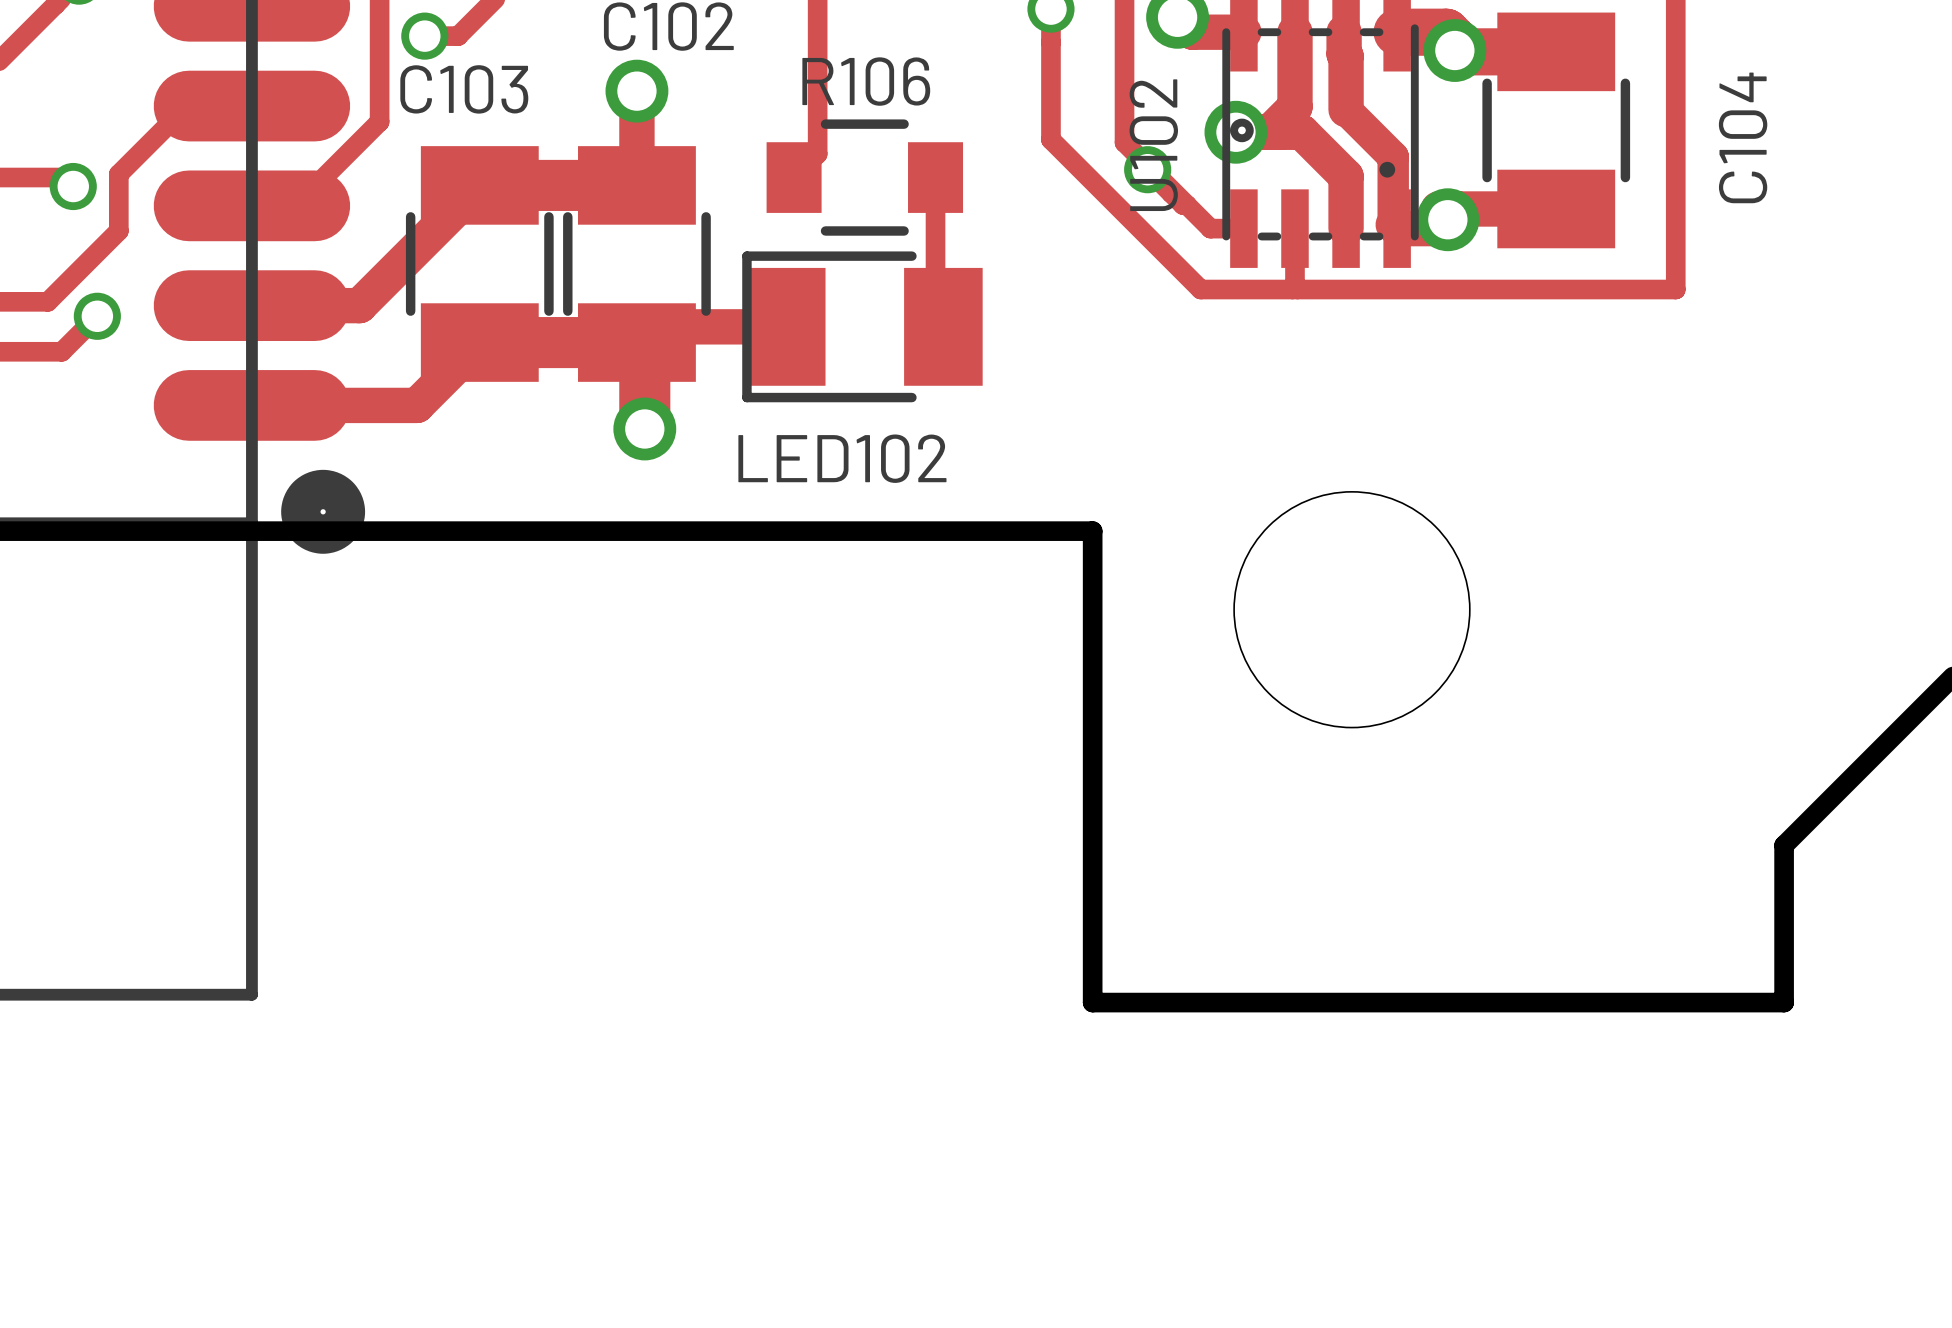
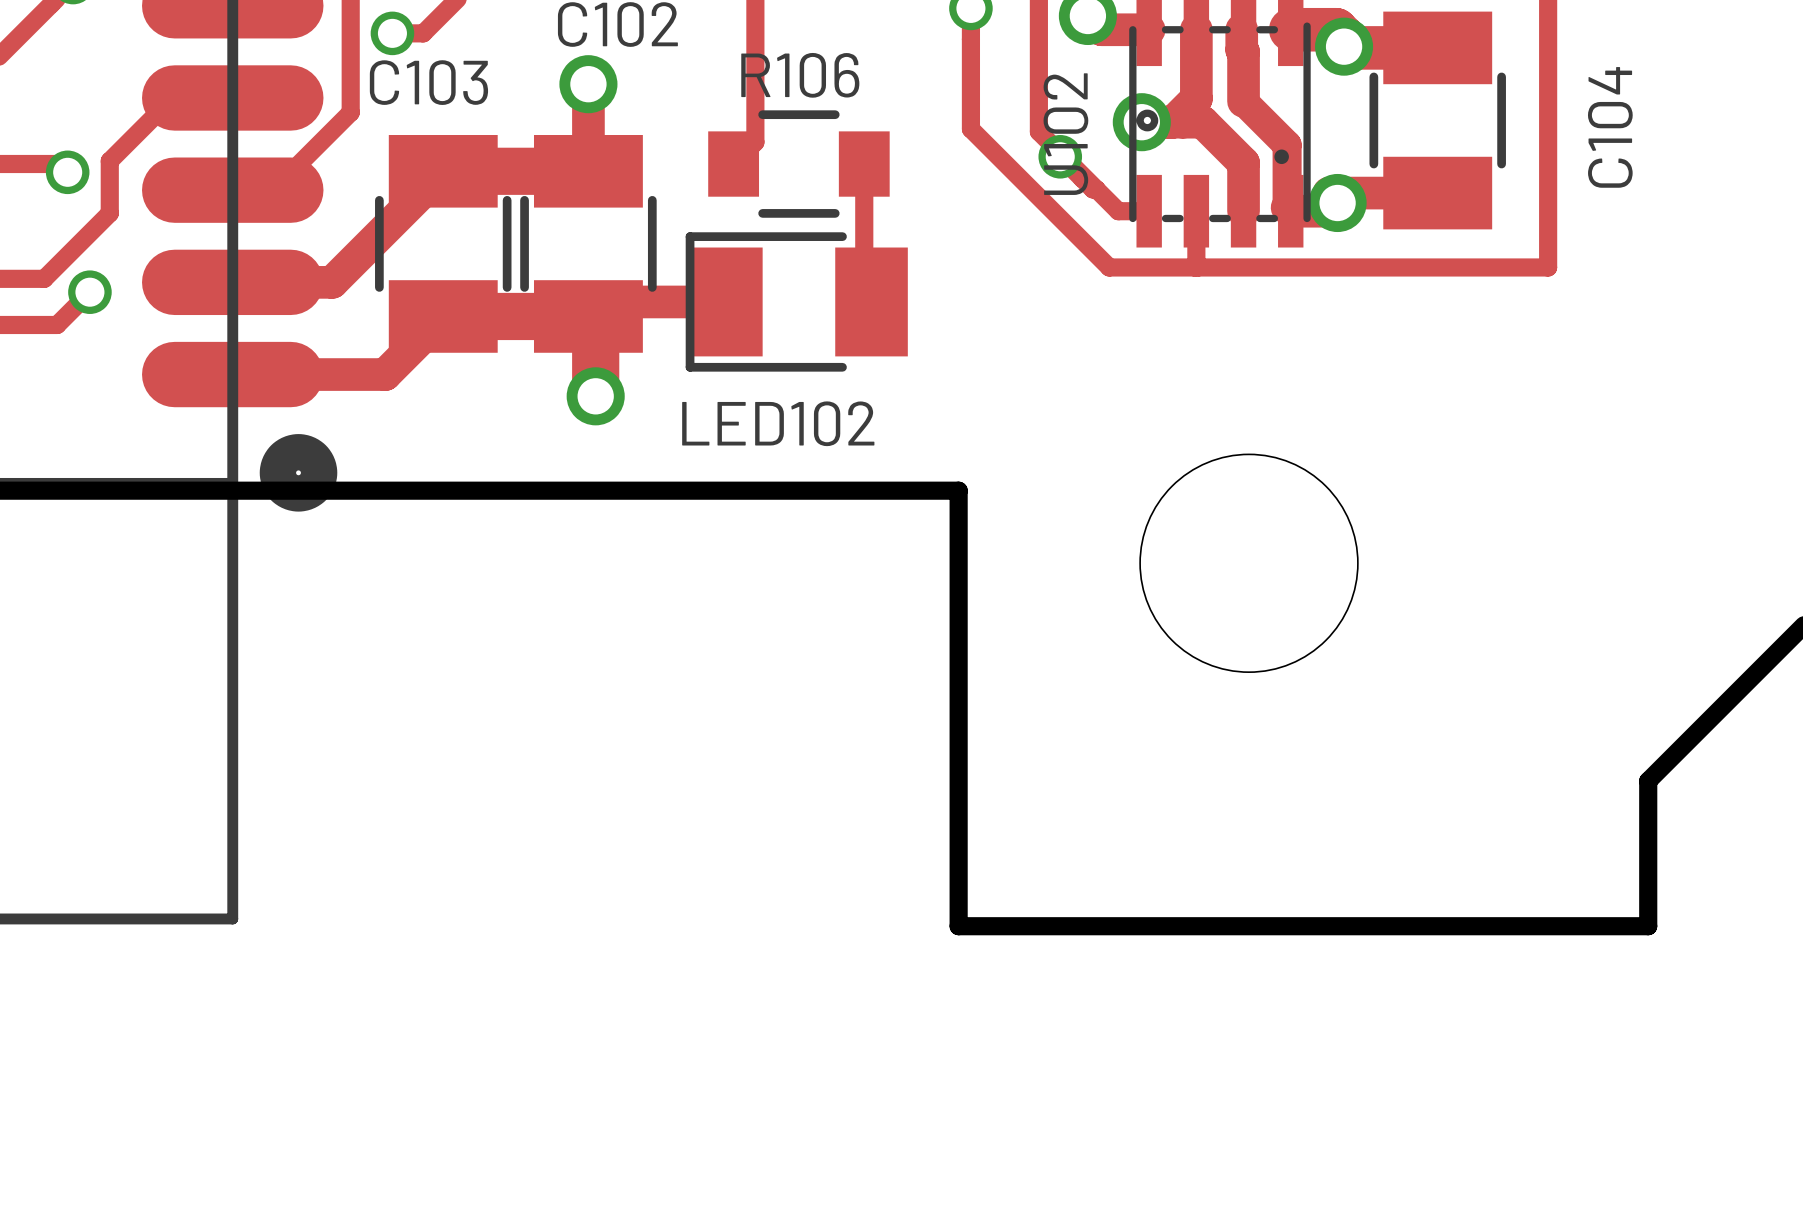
board edge: (1037, 531) (1092, 531) (1092, 1002) -> (958, 490) (958, 926) (1009, 926)

